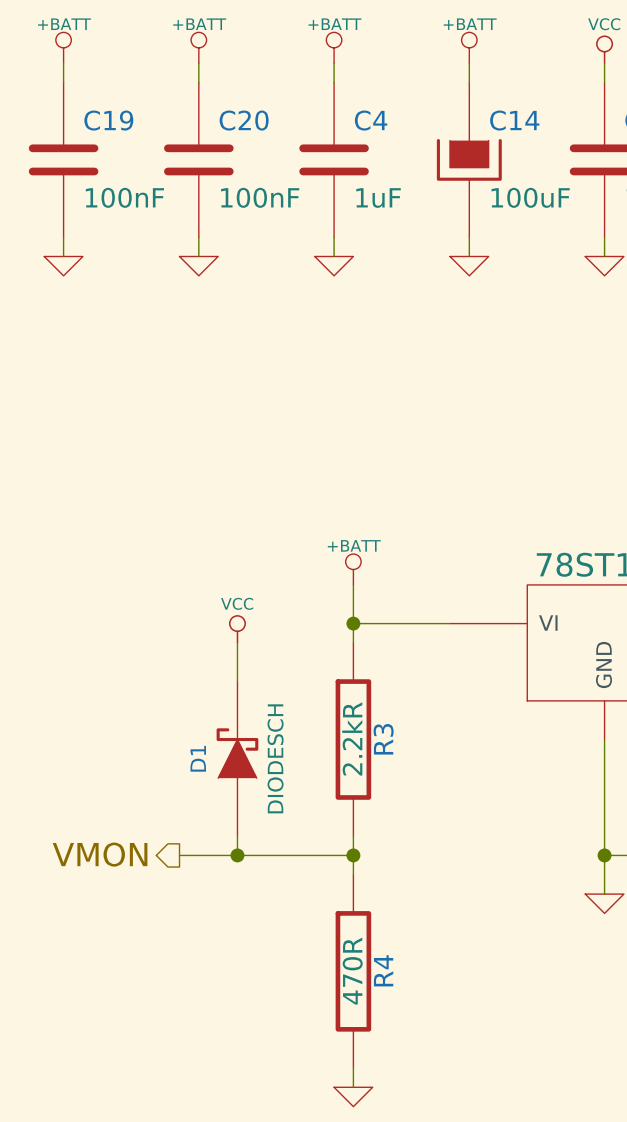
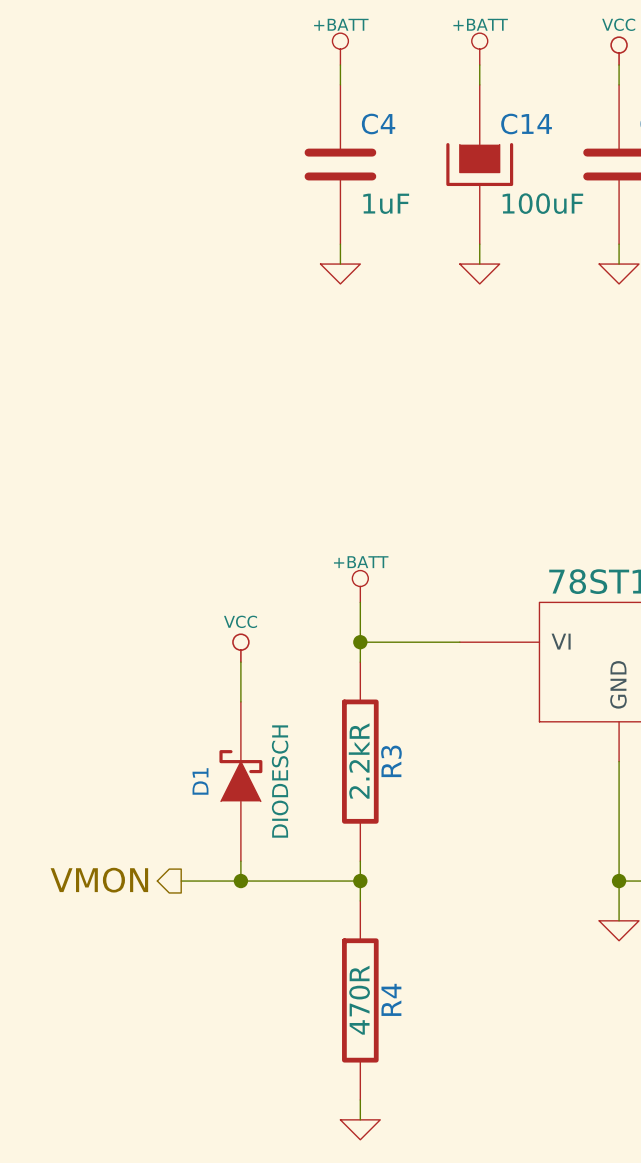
power symbol: +BATT (63, 47) -> none
power symbol: +BATT (198, 47) -> none
wire: (63, 63) (63, 82) -> none
wire: (198, 63) (198, 82) -> none
C19: 100nF (63, 159) -> none
C20: 100nF (198, 159) -> none
wire: (63, 237) (63, 256) -> none
wire: (198, 237) (198, 256) -> none
power symbol: (63, 266) -> none
power symbol: (198, 266) -> none

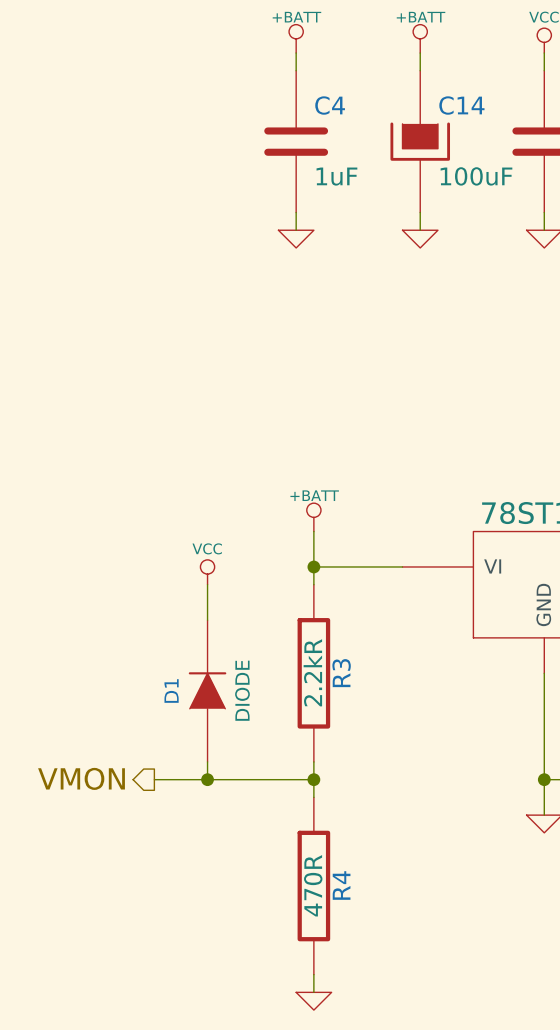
D1 symbol: [219, 701, 263, 862] -> [188, 620, 227, 762]
D1 value: DIODESCH (280, 781) -> DIODE (242, 690)

